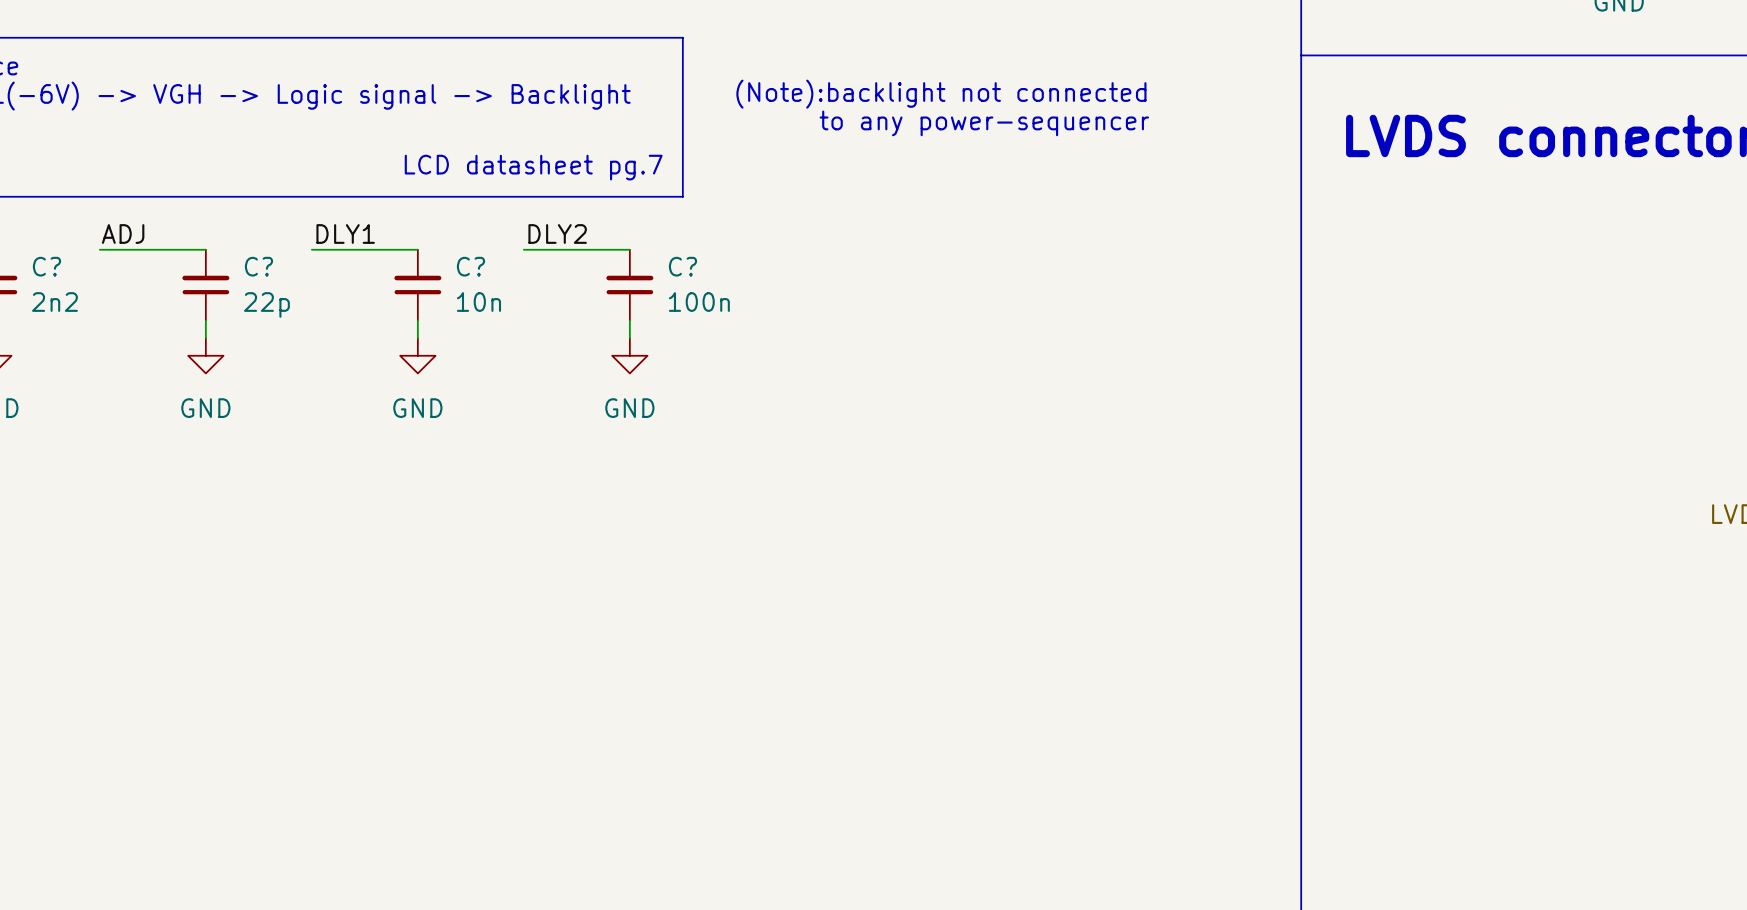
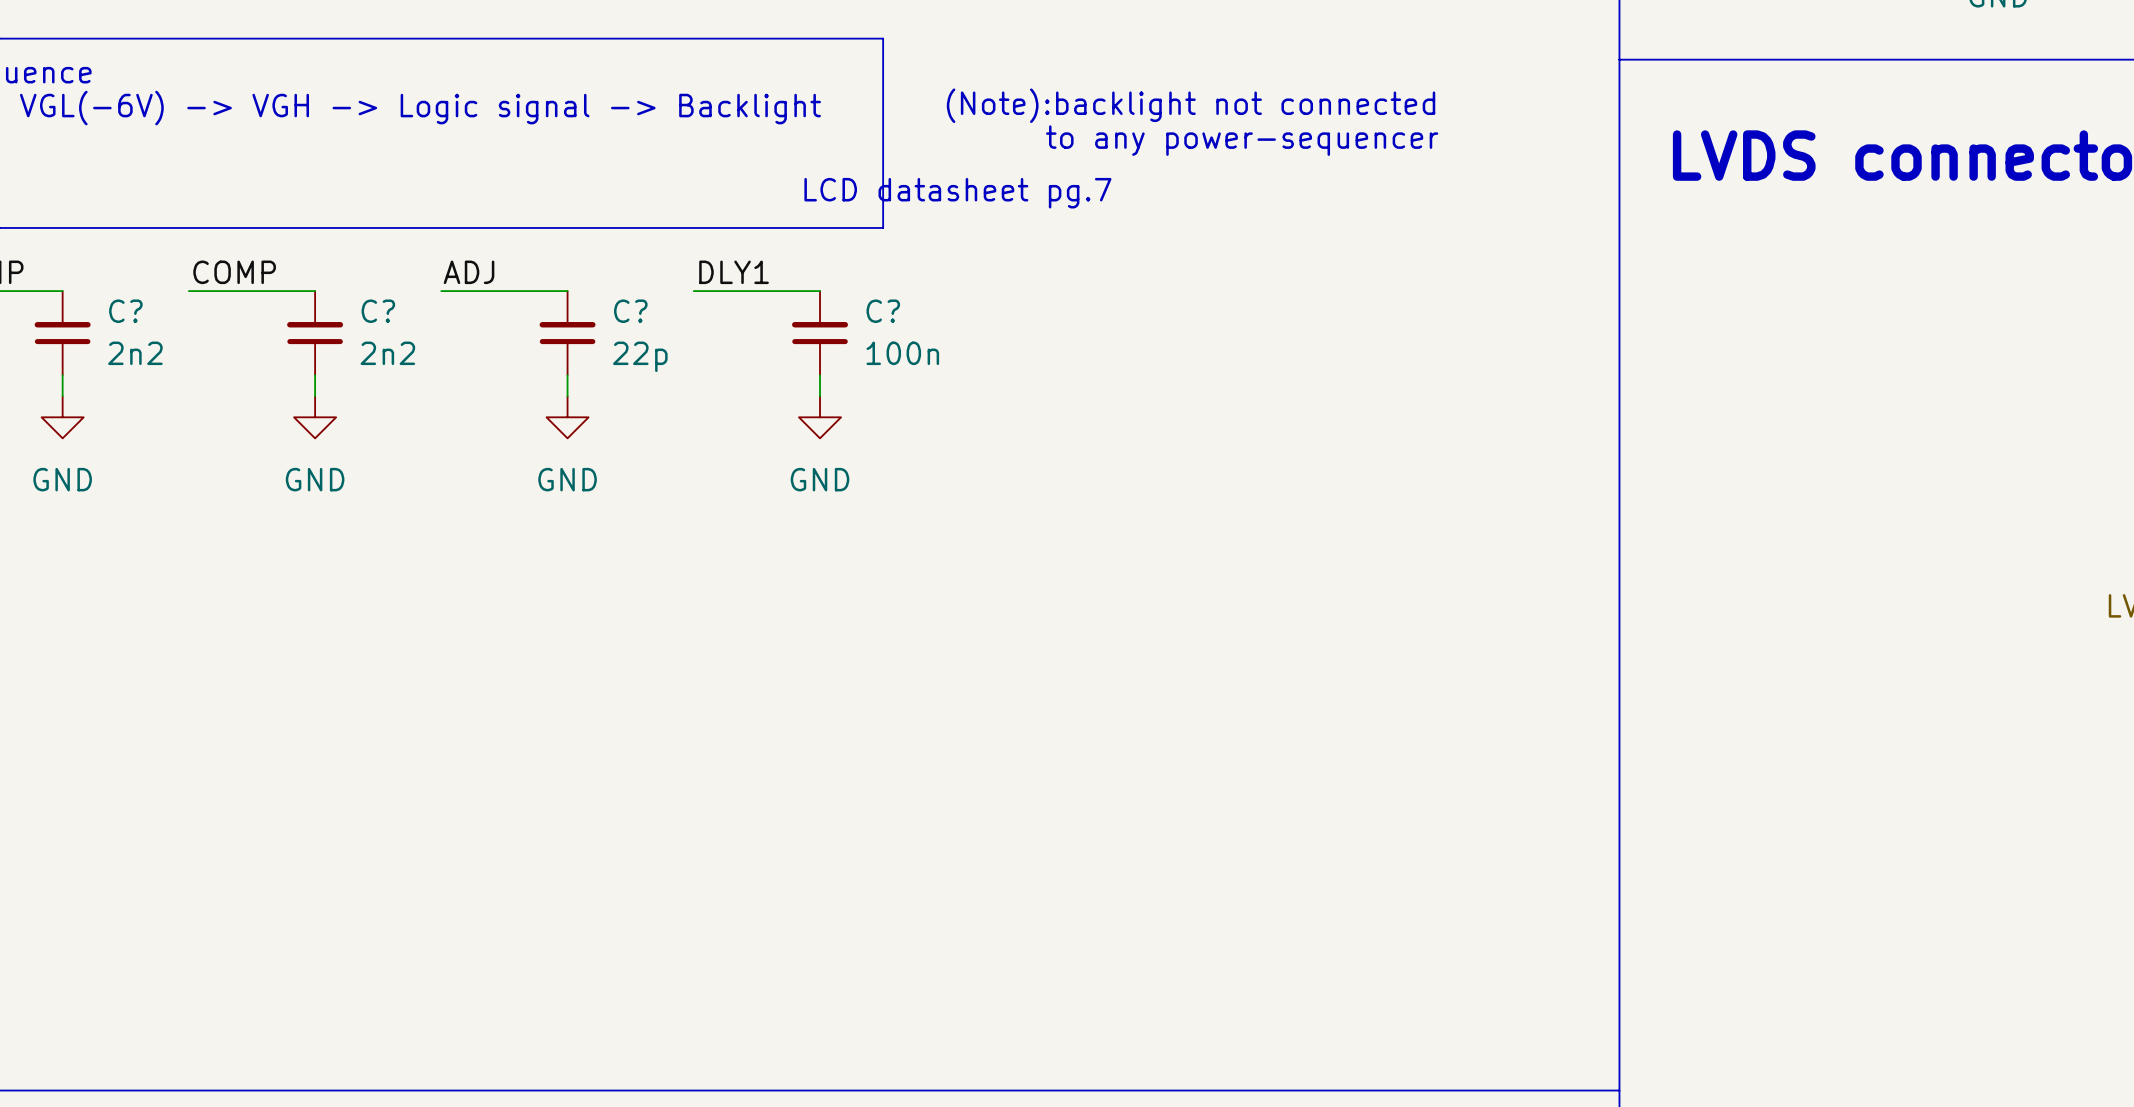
text position: LCD datasheet pg.7 (533, 167) -> LCD datasheet pg.7 (957, 193)
label: ADJ (123, 234) -> COMP (234, 272)
label: DLY1 (345, 234) -> ADJ (469, 272)
label: DLY2 (557, 234) -> DLY1 (734, 272)
C? text: 10n (478, 302) -> 22p (640, 356)
C? text: 22p (266, 304) -> 2n2 (387, 353)

